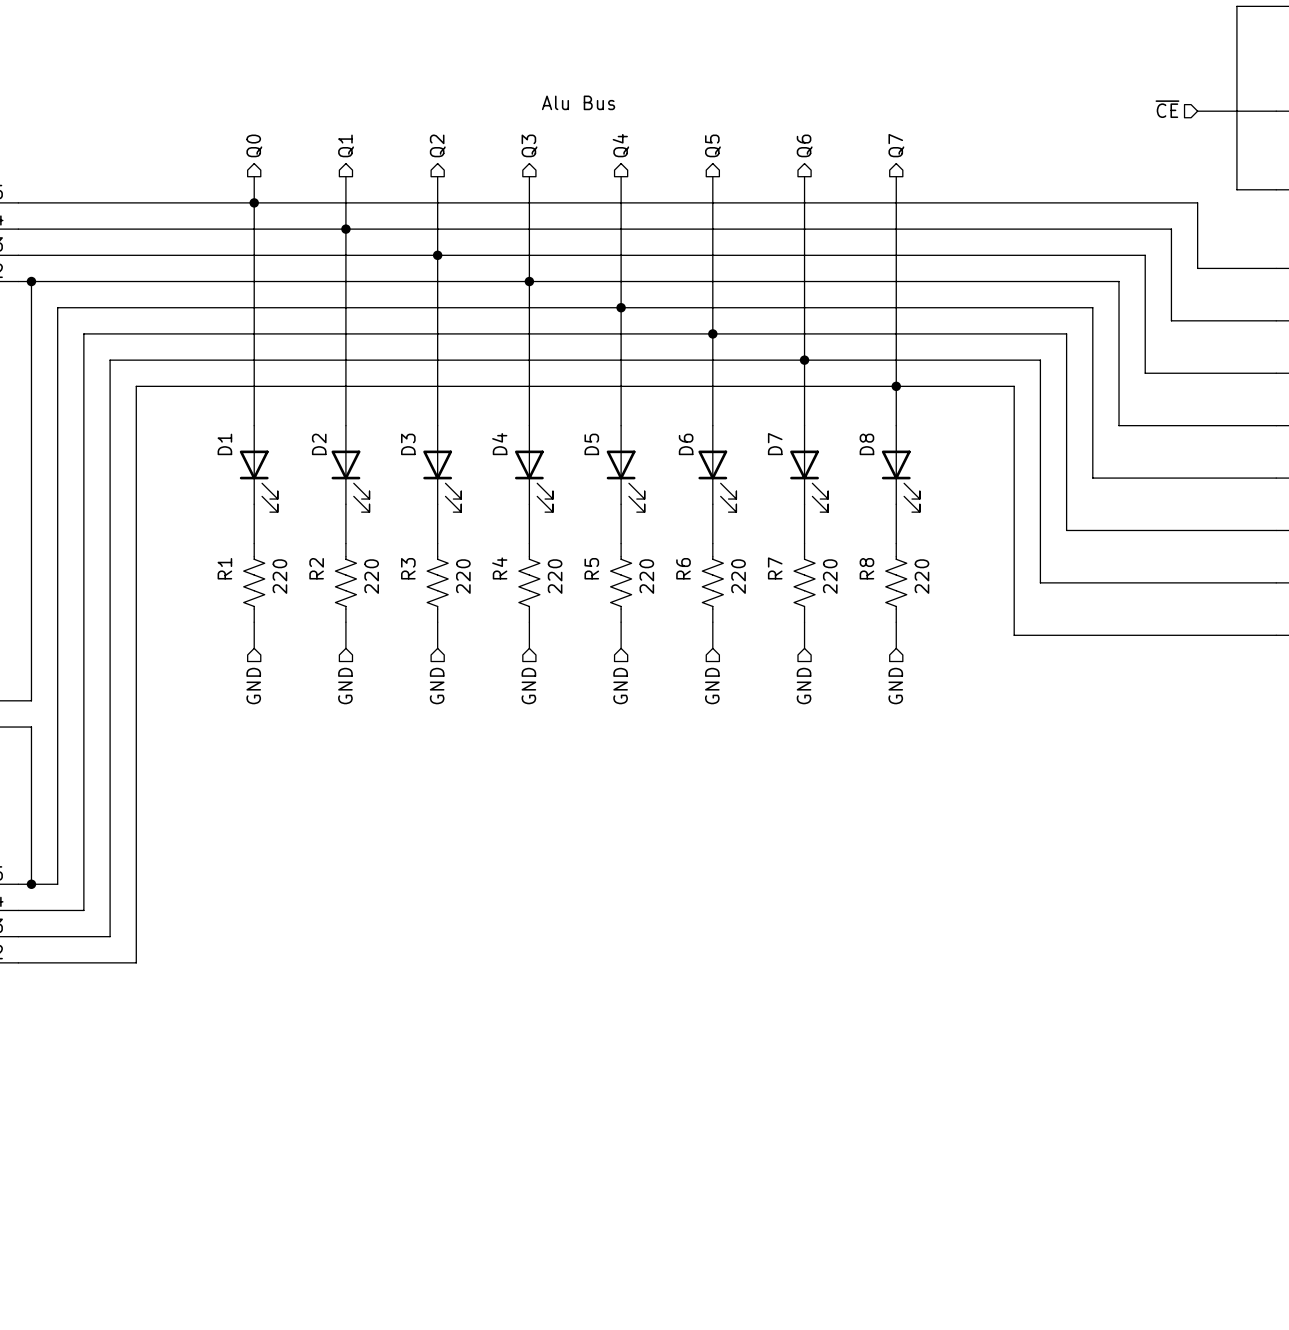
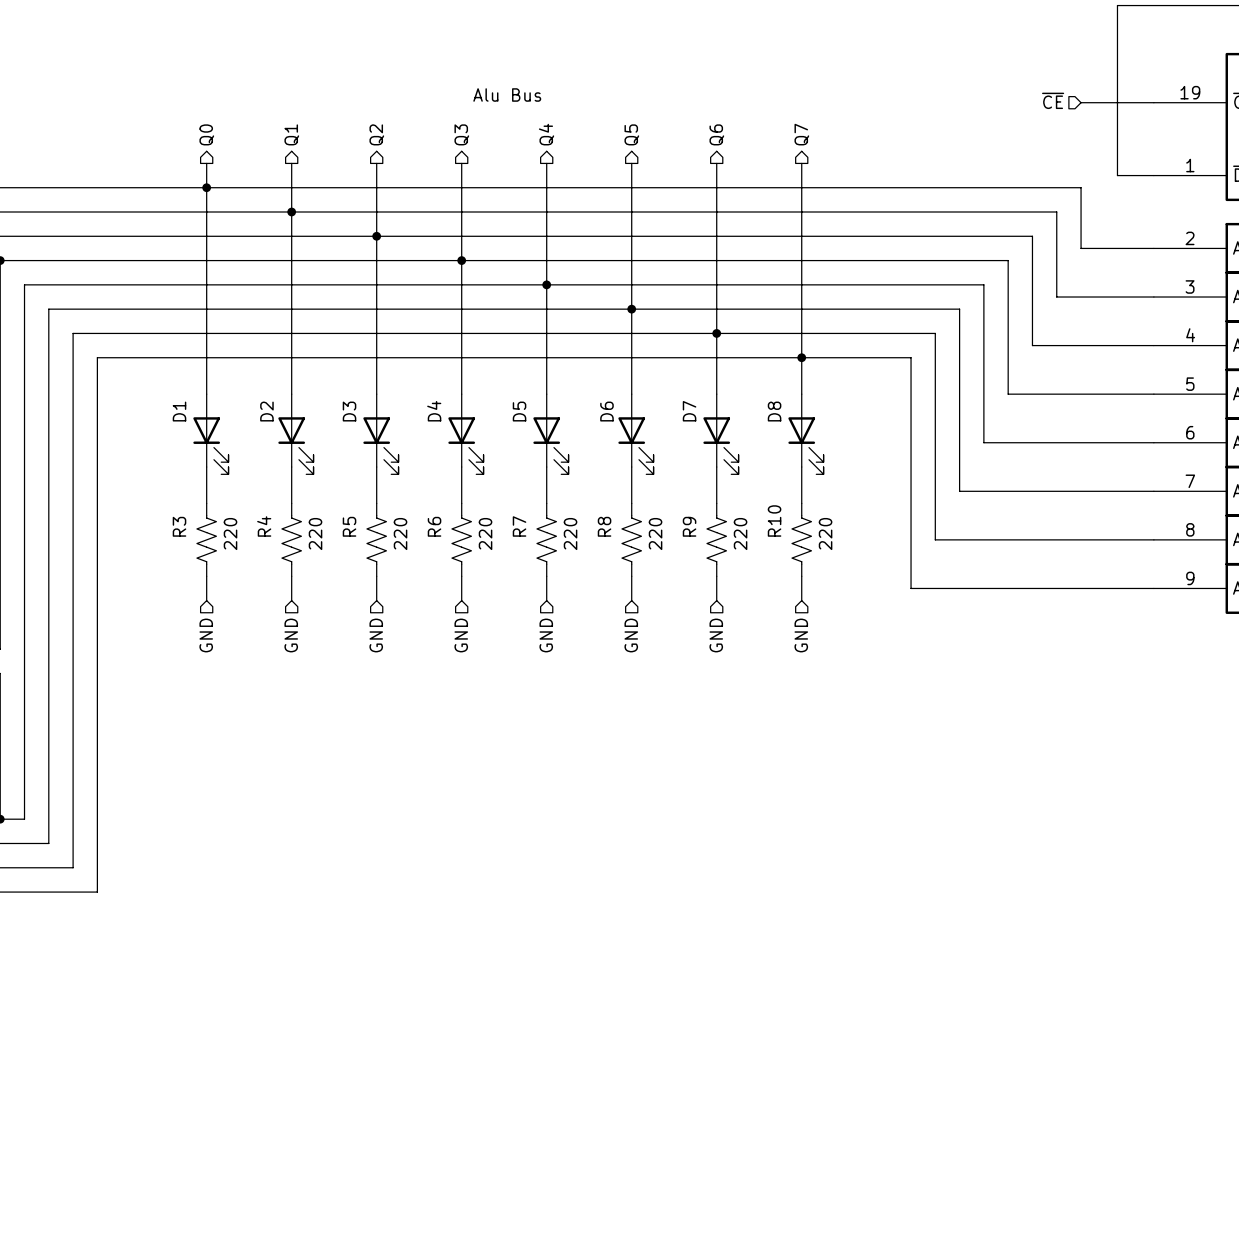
R1 name: R1 (224, 568) -> R3 (179, 526)
R2 name: R2 (316, 568) -> R4 (264, 526)
R3 name: R3 (408, 568) -> R5 (349, 526)
R4 name: R4 (499, 568) -> R6 (434, 526)
R5 name: R5 (591, 568) -> R7 (519, 526)
R6 name: R6 (683, 568) -> R8 (604, 526)
R7 name: R7 (775, 568) -> R9 (689, 526)
R8 name: R8 (866, 568) -> R10 (774, 521)

